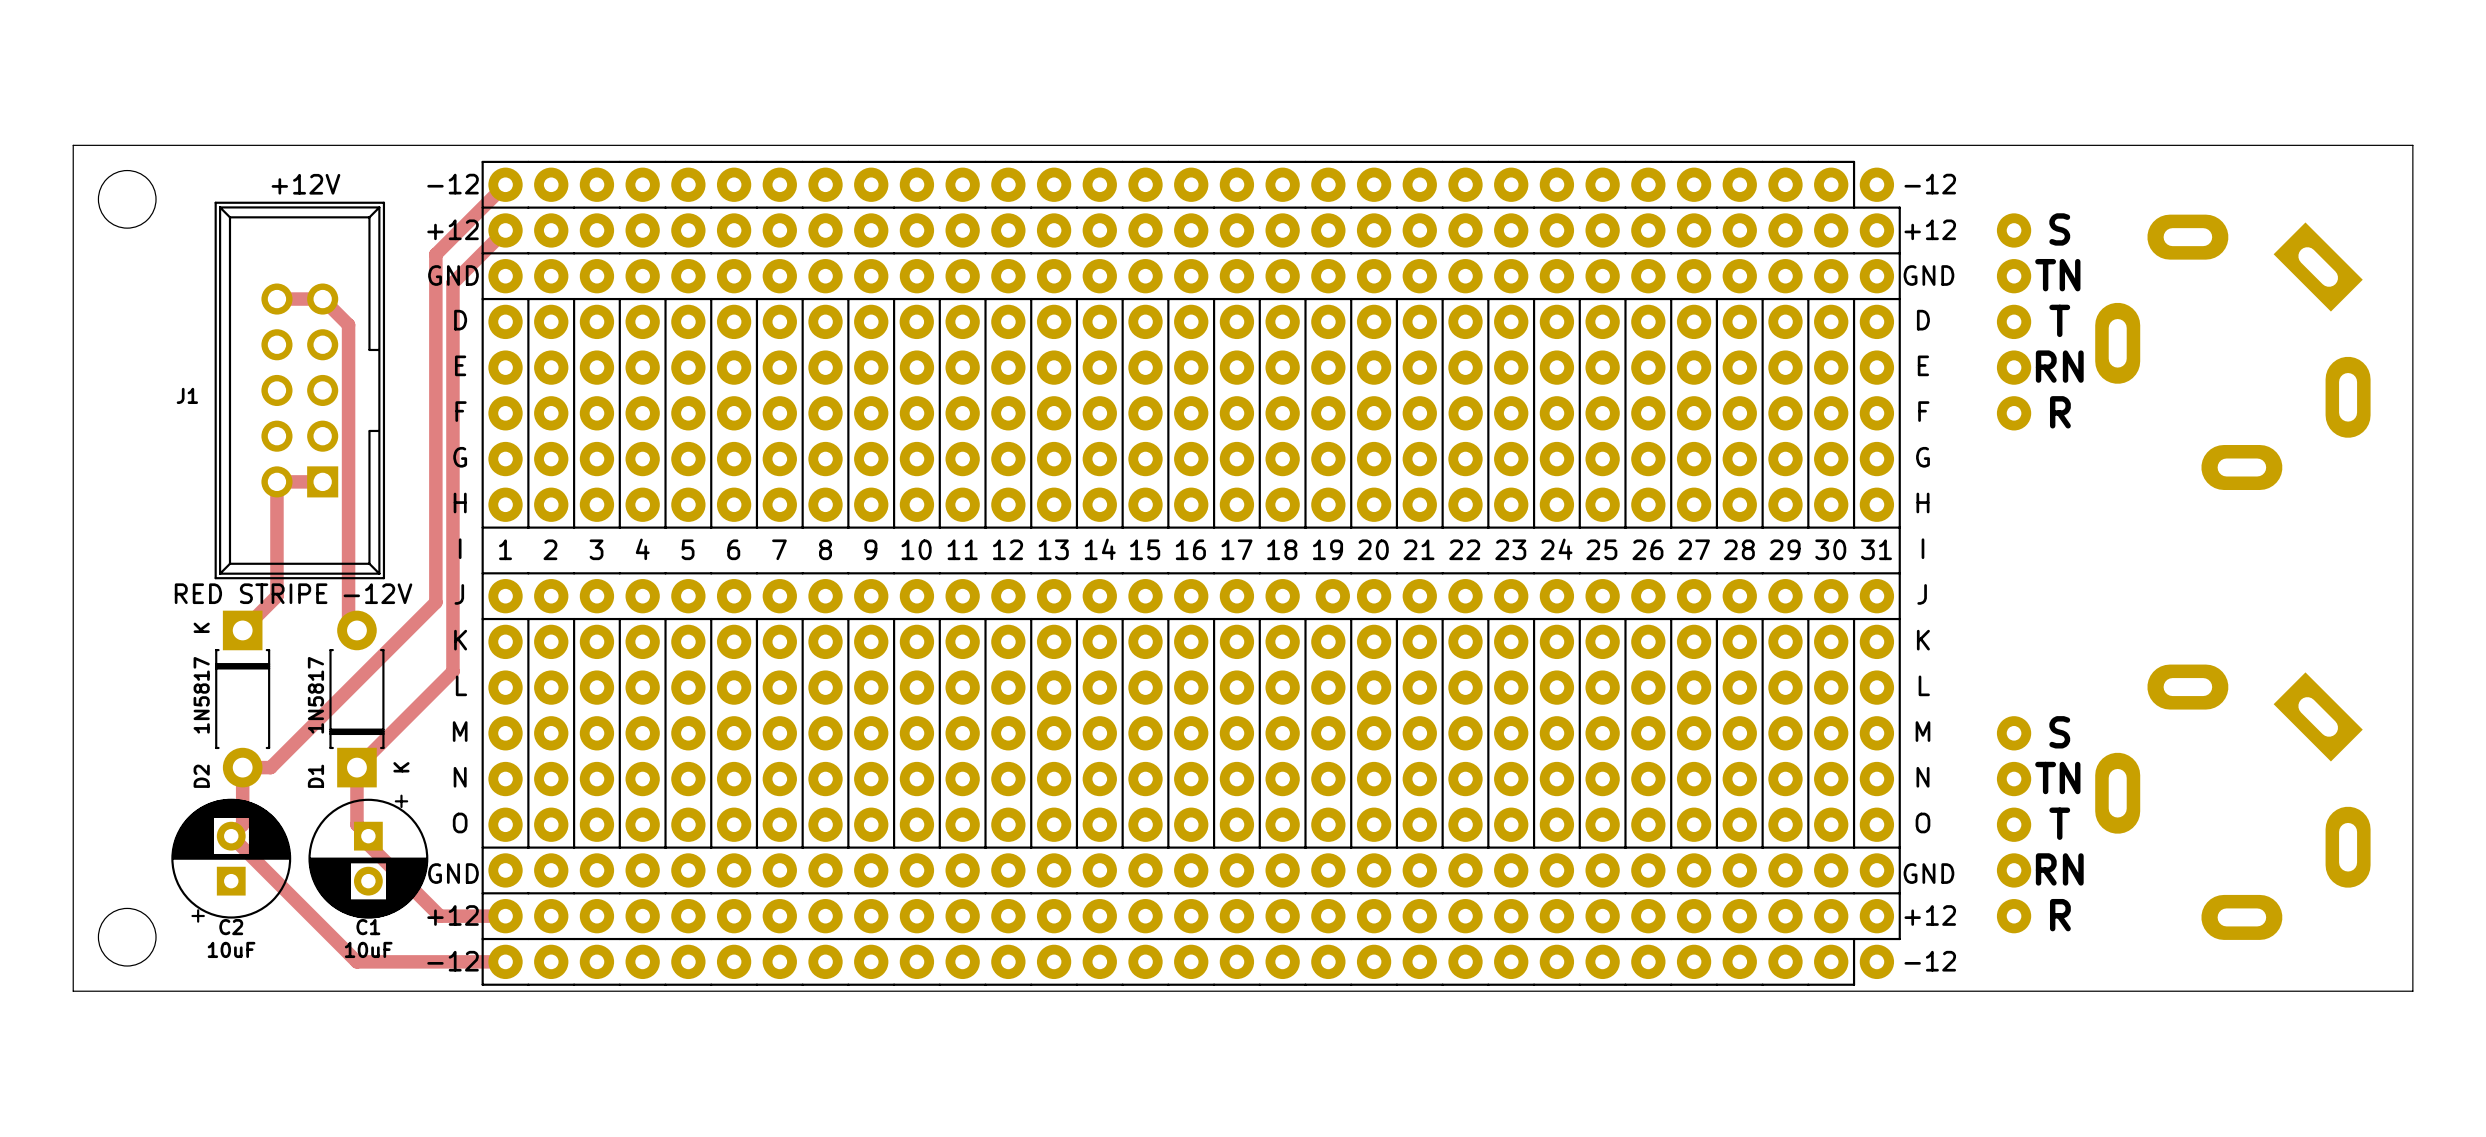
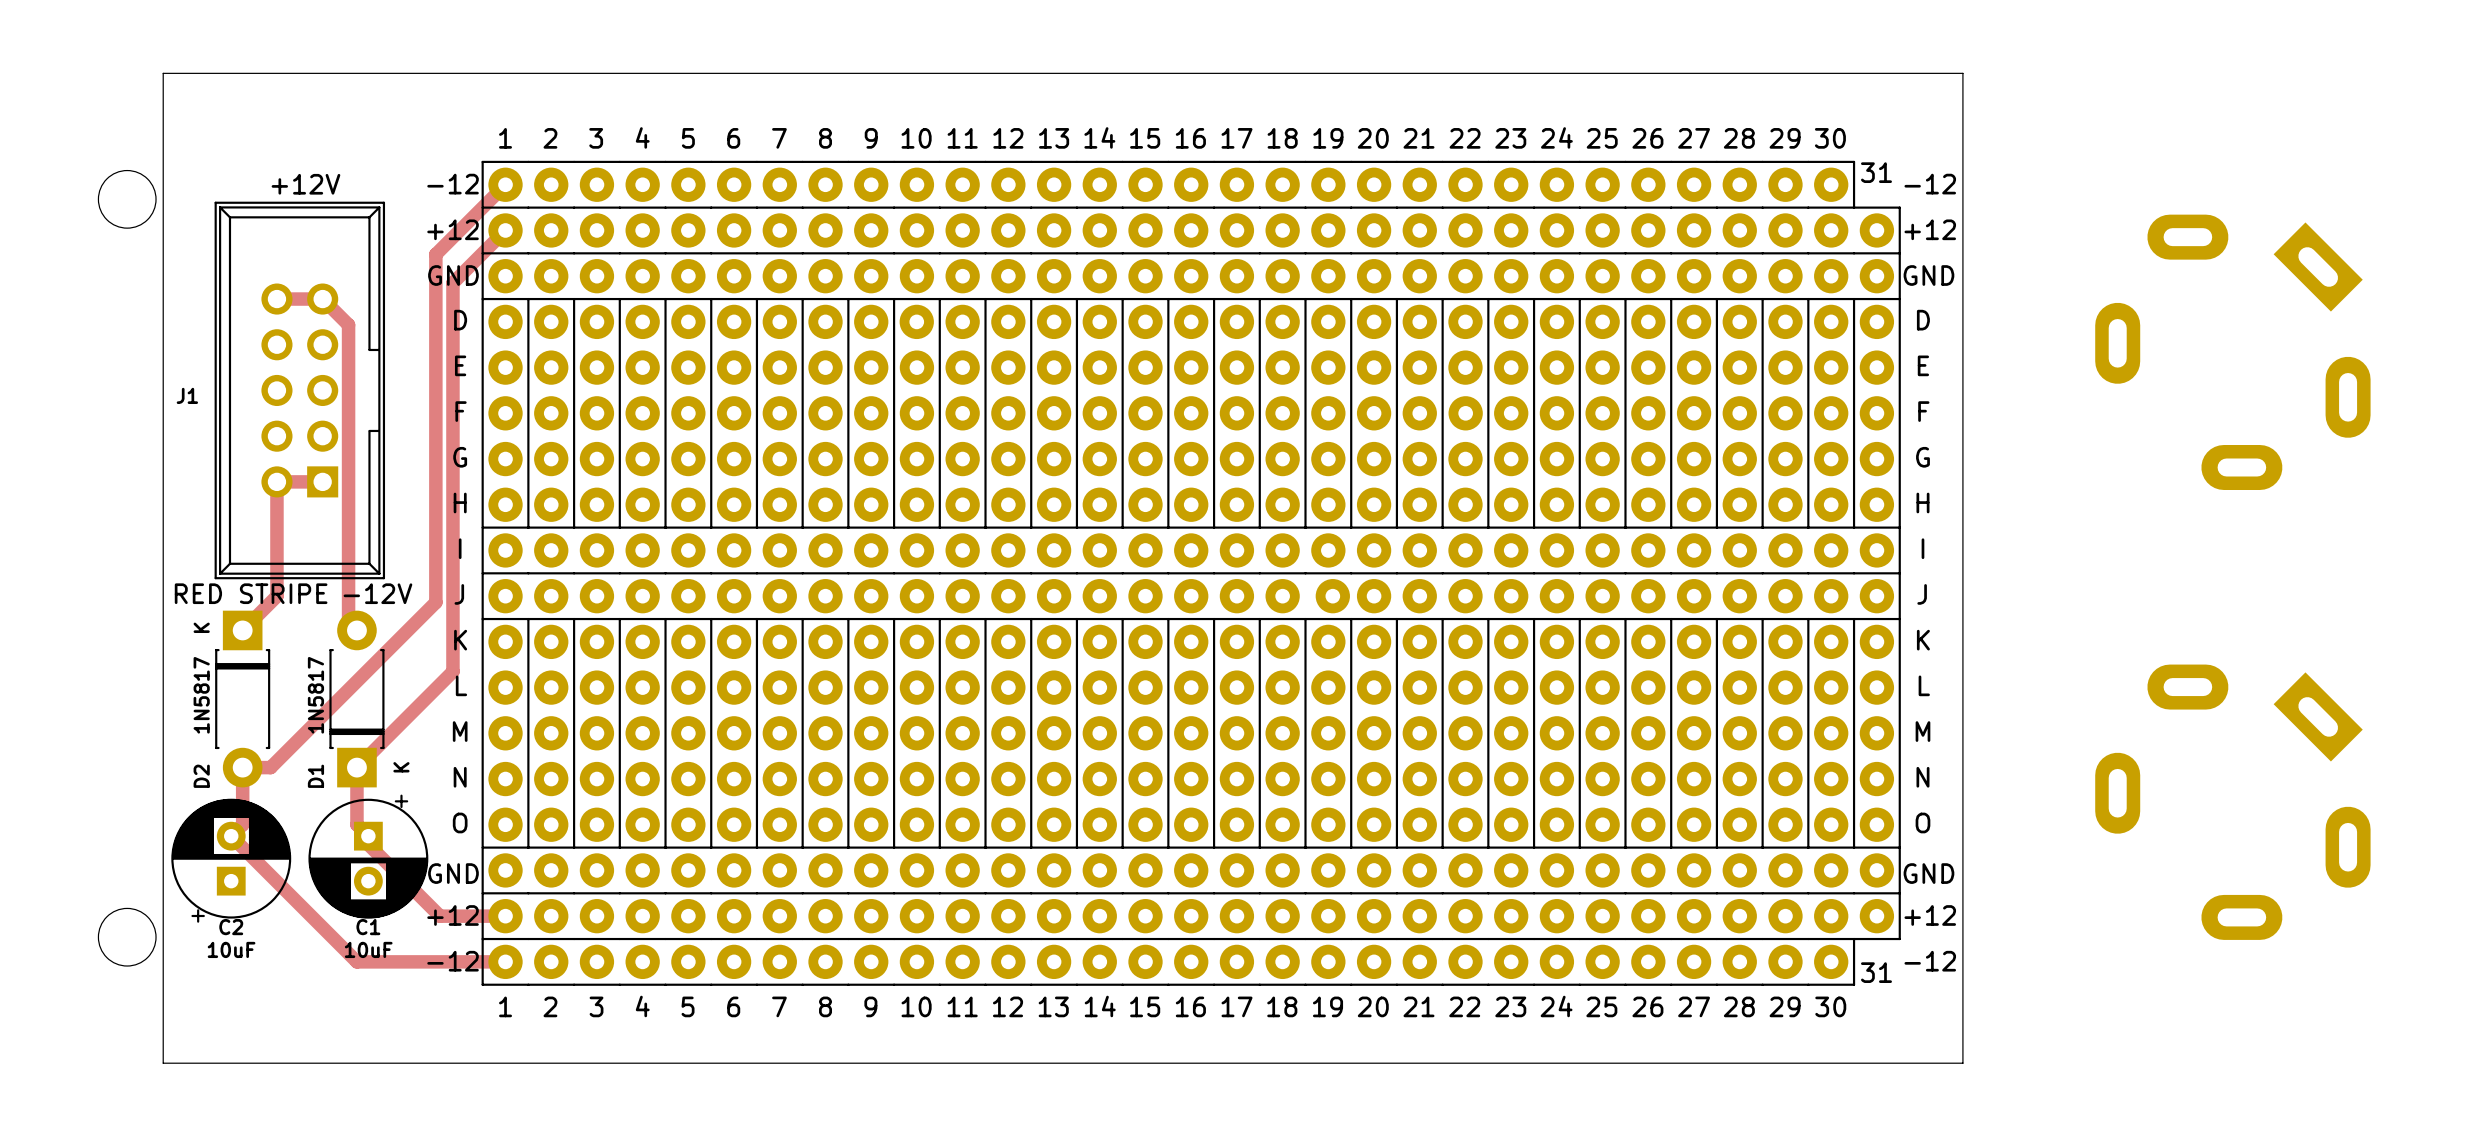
text: none -> 4 (642, 137)
text: none -> 14 (1099, 137)
text: none -> 24 (1556, 137)
text: none -> 1 (505, 138)
text: none -> 2 (550, 138)
text: none -> 3 (596, 138)
text: none -> 5 (688, 138)
text: none -> 6 (733, 138)
text: none -> 7 (779, 138)
text: none -> 8 (825, 138)
text: none -> 9 (871, 138)
text: none -> 10 (916, 138)
text: none -> 11 (962, 138)
text: none -> 12 (1008, 138)
text: none -> 13 (1054, 138)
text: none -> 15 (1145, 138)
text: none -> 16 (1190, 138)
text: none -> 17 (1237, 138)
text: none -> 18 (1282, 138)
text: none -> 19 (1328, 138)
text: none -> 20 (1373, 138)
text: none -> 21 (1418, 138)
text: none -> 22 (1465, 138)
text: none -> 23 (1510, 138)
text: none -> 25 (1602, 138)
text: none -> 26 (1647, 138)
text: none -> 27 (1694, 138)
text: none -> 28 (1739, 138)
text: none -> 29 (1785, 138)
text: none -> 30 (1830, 138)
board edge: (73, 145) (73, 991) (2412, 991) (2412, 145) (73, 145) -> (163, 73) (163, 1063) (1962, 1063) (1962, 73) (163, 73)
text: none -> 31 (1876, 172)
part: (1876, 184) -> none
text: S (2059, 229) -> none
part: (2014, 230) -> none
text: TN (2057, 275) -> none
part: (2014, 276) -> none
text: T (2059, 320) -> none
part: (2014, 321) -> none
text: RN (2059, 366) -> none
part: (2014, 367) -> none
text: R (2060, 412) -> none
part: (2014, 413) -> none
text: 1 (505, 549) -> none
text: 2 (550, 549) -> none
text: 3 (596, 549) -> none
text: 4 (642, 549) -> none
text: 5 (688, 549) -> none
text: 6 (733, 549) -> none
text: 7 (779, 549) -> none
text: 8 (825, 549) -> none
text: 9 (870, 549) -> none
text: 10 (916, 549) -> none
text: 11 (962, 549) -> none
text: 12 (1008, 549) -> none
text: 13 (1053, 549) -> none
text: 14 (1100, 549) -> none
text: 15 (1145, 549) -> none
text: 16 (1190, 549) -> none
text: 17 (1237, 549) -> none
text: 18 (1282, 549) -> none
text: 19 (1327, 549) -> none
text: 20 (1373, 549) -> none
text: 21 (1418, 549) -> none
text: 22 (1464, 549) -> none
text: 23 (1510, 549) -> none
text: 24 (1556, 549) -> none
text: 25 (1601, 549) -> none
text: 26 (1647, 549) -> none
text: 27 (1694, 549) -> none
text: 28 (1739, 549) -> none
text: 29 (1785, 549) -> none
text: 30 (1830, 549) -> none
text: 31 (1876, 549) -> none
part: none -> (505, 550)
part: none -> (551, 550)
part: none -> (596, 550)
part: none -> (642, 550)
part: none -> (688, 550)
part: none -> (734, 550)
part: none -> (779, 550)
part: none -> (825, 550)
part: none -> (871, 550)
part: none -> (916, 550)
part: none -> (962, 550)
part: none -> (1008, 550)
part: none -> (1054, 550)
part: none -> (1099, 550)
part: none -> (1145, 550)
part: none -> (1191, 550)
part: none -> (1236, 550)
part: none -> (1282, 550)
part: none -> (1328, 550)
part: none -> (1374, 550)
part: none -> (1419, 550)
part: none -> (1465, 550)
part: none -> (1511, 550)
part: none -> (1556, 550)
part: none -> (1602, 550)
part: none -> (1648, 550)
part: none -> (1694, 550)
part: none -> (1739, 550)
part: none -> (1785, 550)
part: none -> (1831, 550)
part: none -> (1876, 550)
text: S (2059, 732) -> none
part: (2014, 733) -> none
text: TN (2057, 778) -> none
part: (2014, 779) -> none
text: T (2059, 823) -> none
part: (2014, 824) -> none
text: RN (2059, 869) -> none
part: (2014, 870) -> none
text: R (2060, 915) -> none
part: (2014, 916) -> none
part: (1876, 961) -> none
text: none -> 31 (1876, 972)
text: none -> 1 (505, 1006)
text: none -> 2 (550, 1006)
text: none -> 3 (596, 1006)
text: none -> 4 (642, 1006)
text: none -> 5 (688, 1006)
text: none -> 6 (733, 1006)
text: none -> 7 (779, 1006)
text: none -> 8 (825, 1006)
text: none -> 9 (870, 1006)
text: none -> 10 (916, 1006)
text: none -> 11 (962, 1006)
text: none -> 12 (1008, 1006)
text: none -> 13 (1053, 1006)
text: none -> 14 (1100, 1006)
text: none -> 15 (1145, 1006)
text: none -> 16 (1190, 1006)
text: none -> 17 (1237, 1006)
text: none -> 18 (1282, 1006)
text: none -> 19 (1327, 1006)
text: none -> 20 (1373, 1006)
text: none -> 21 (1418, 1006)
text: none -> 22 (1464, 1006)
text: none -> 23 (1510, 1006)
text: none -> 24 (1556, 1006)
text: none -> 25 (1601, 1006)
text: none -> 26 (1647, 1006)
text: none -> 27 (1694, 1006)
text: none -> 28 (1739, 1006)
text: none -> 29 (1785, 1006)
text: none -> 30 (1830, 1006)

